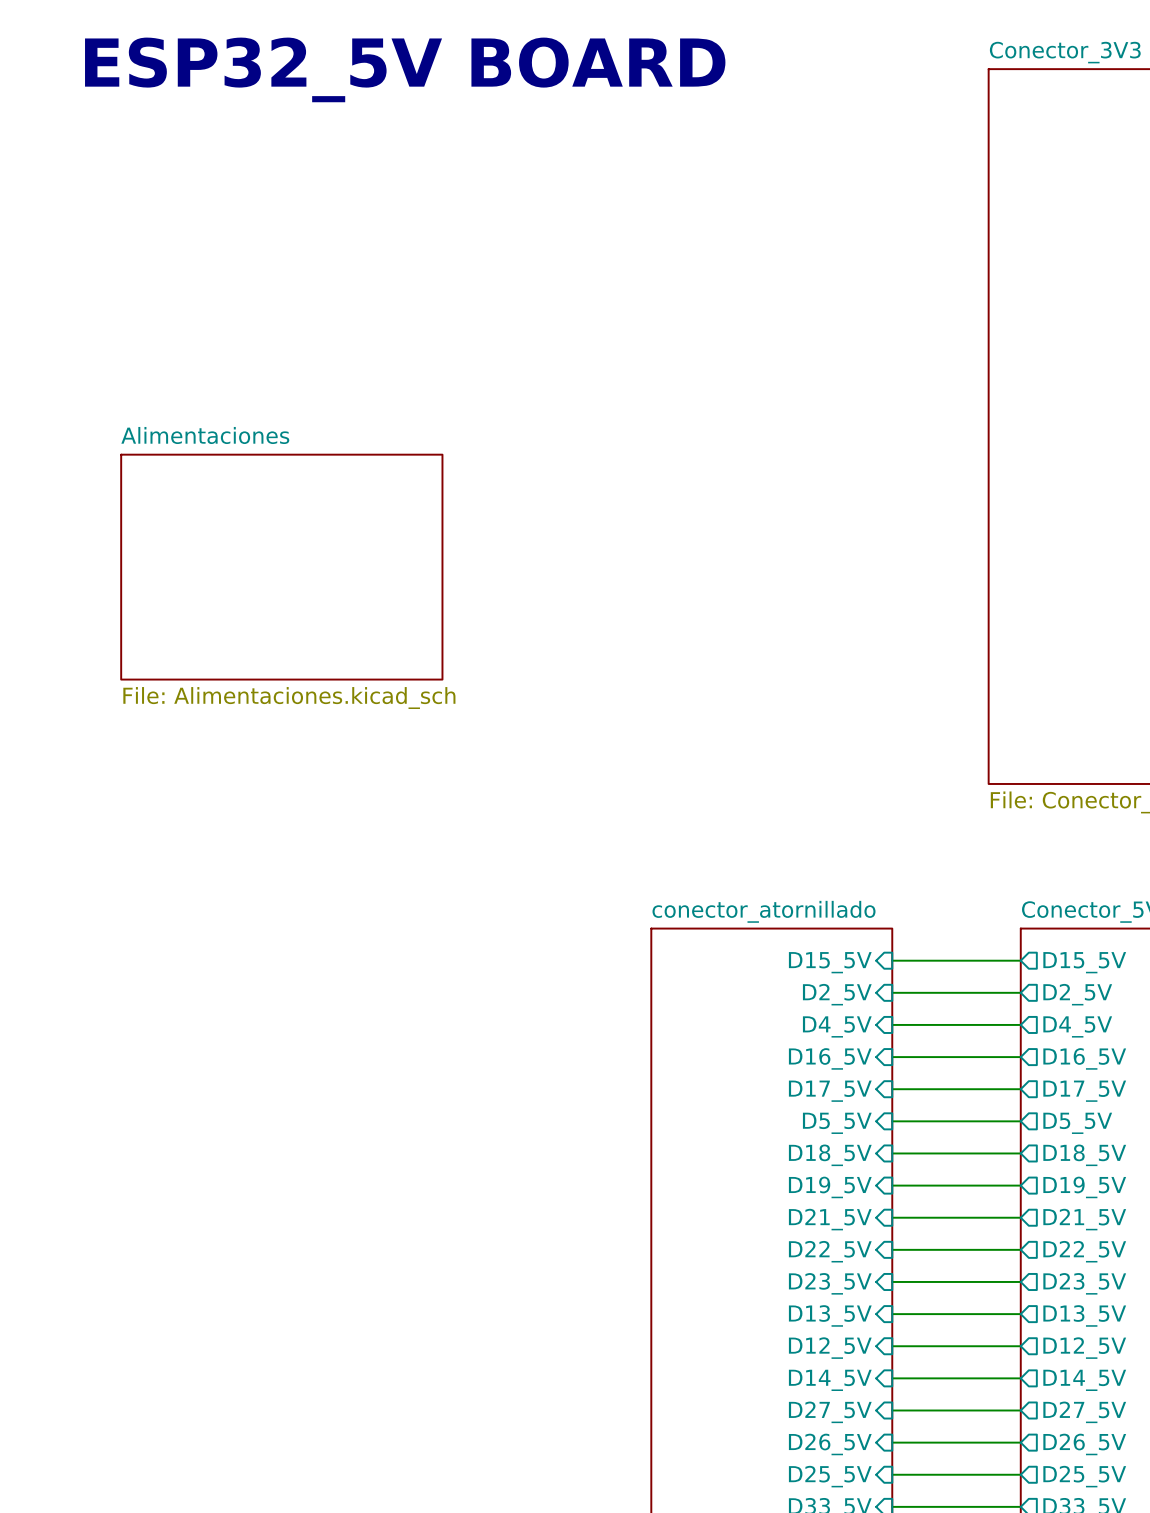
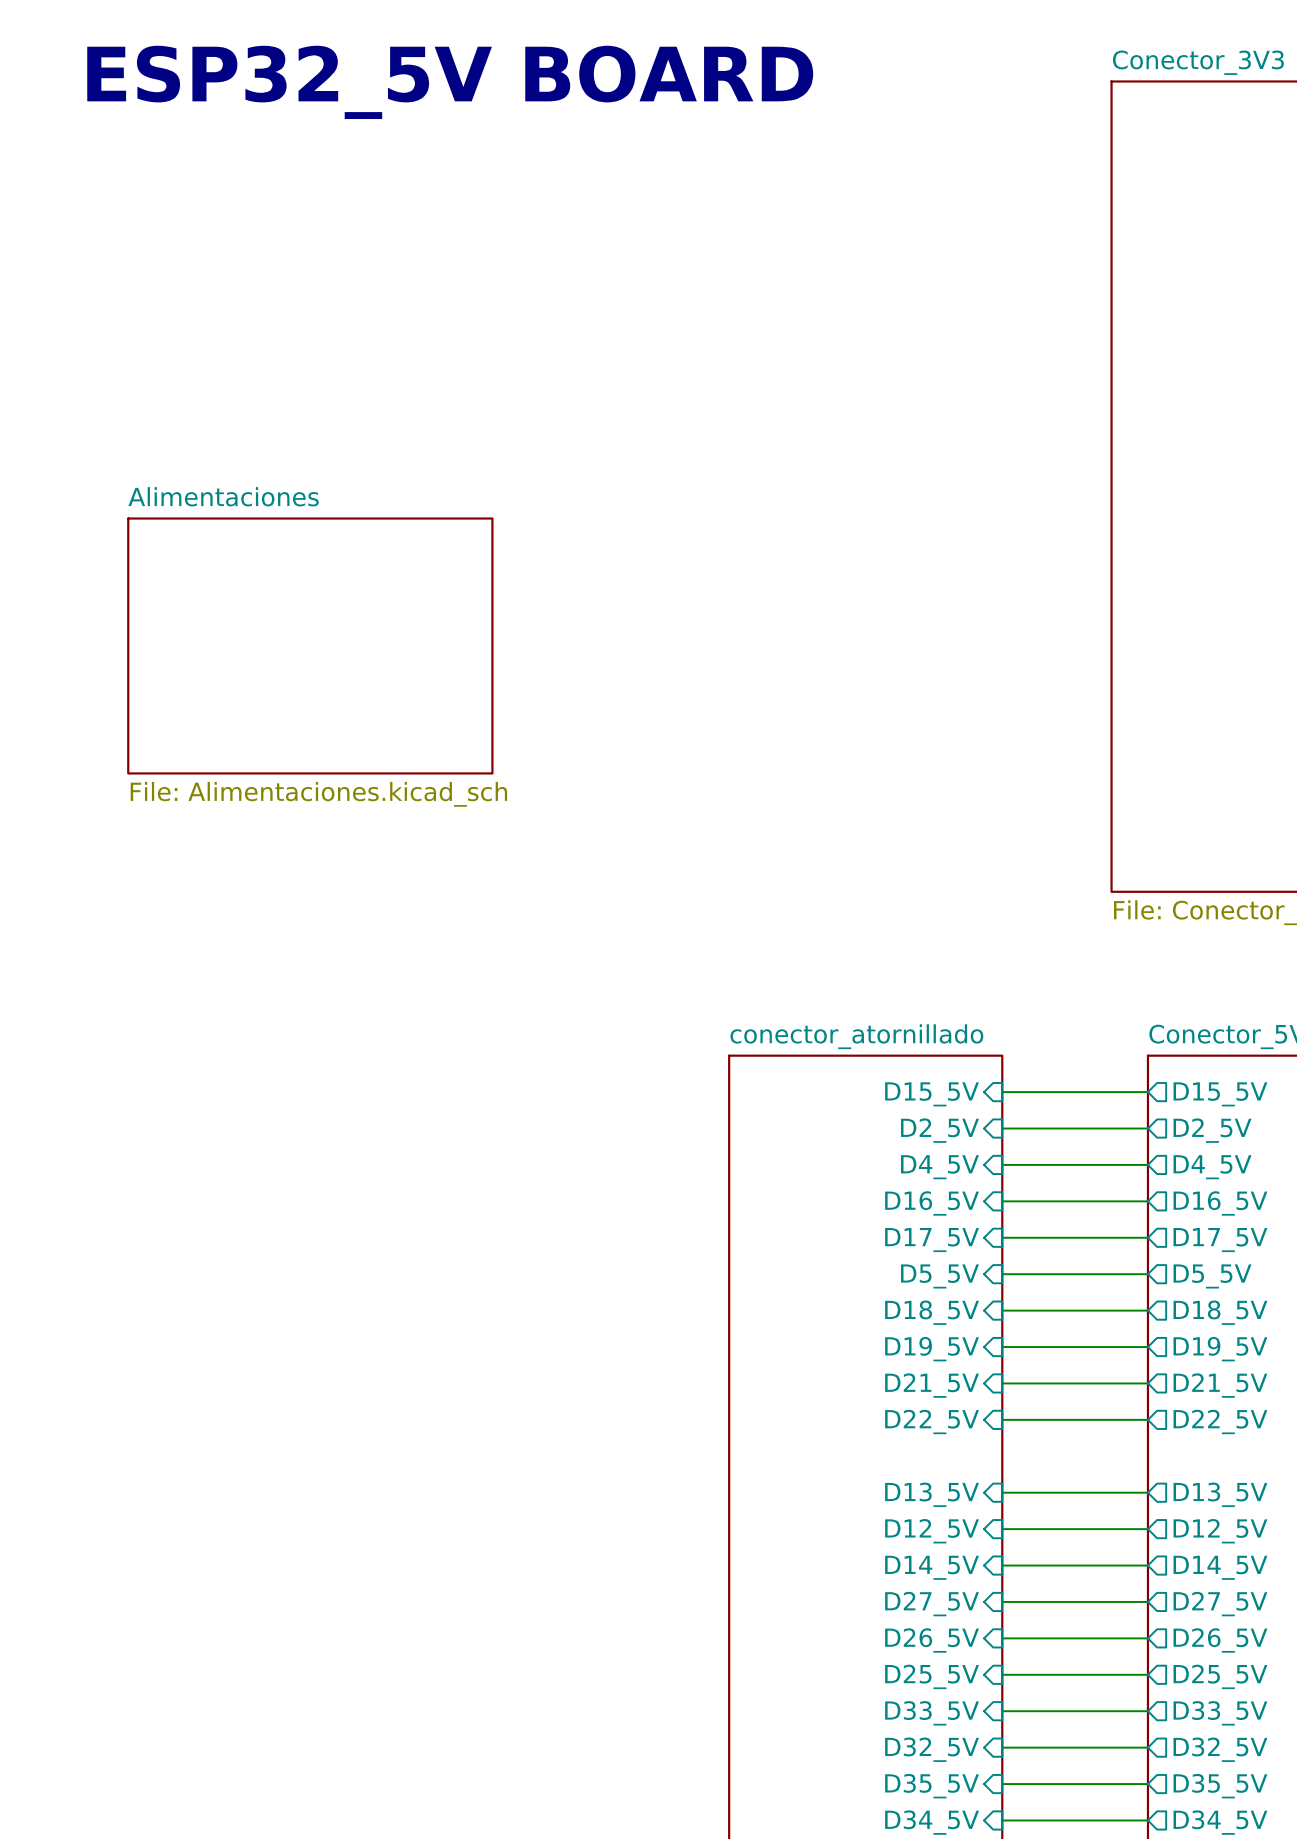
wire: (892, 1281) (1020, 1281) -> none
sheet pin: D23_5V (830, 1283) -> none
sheet pin: D23_5V (1084, 1283) -> none

